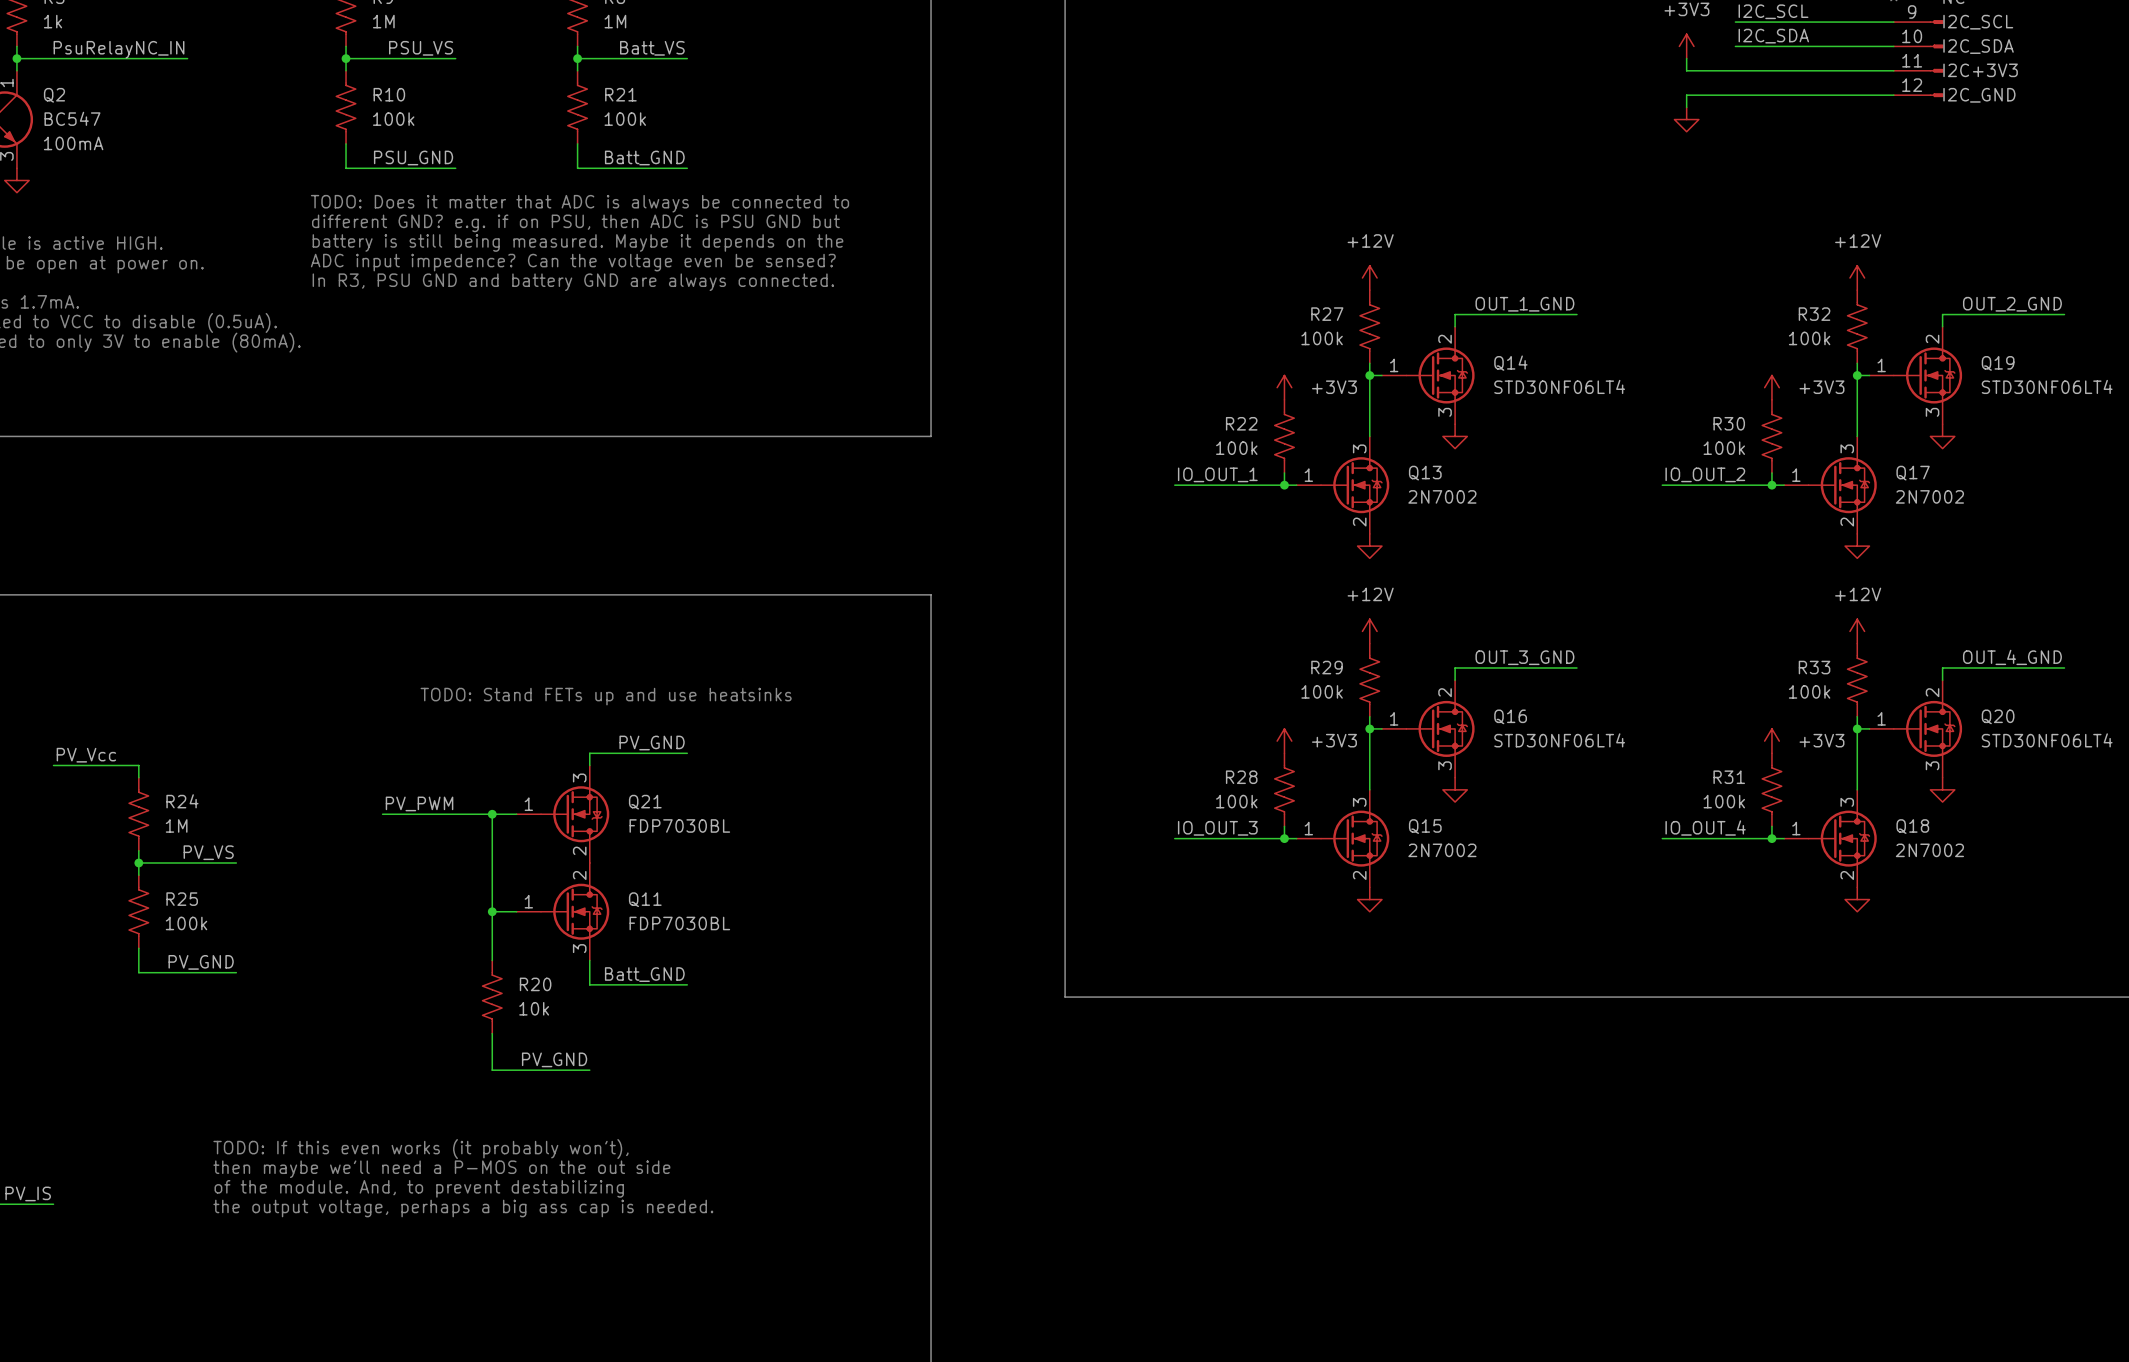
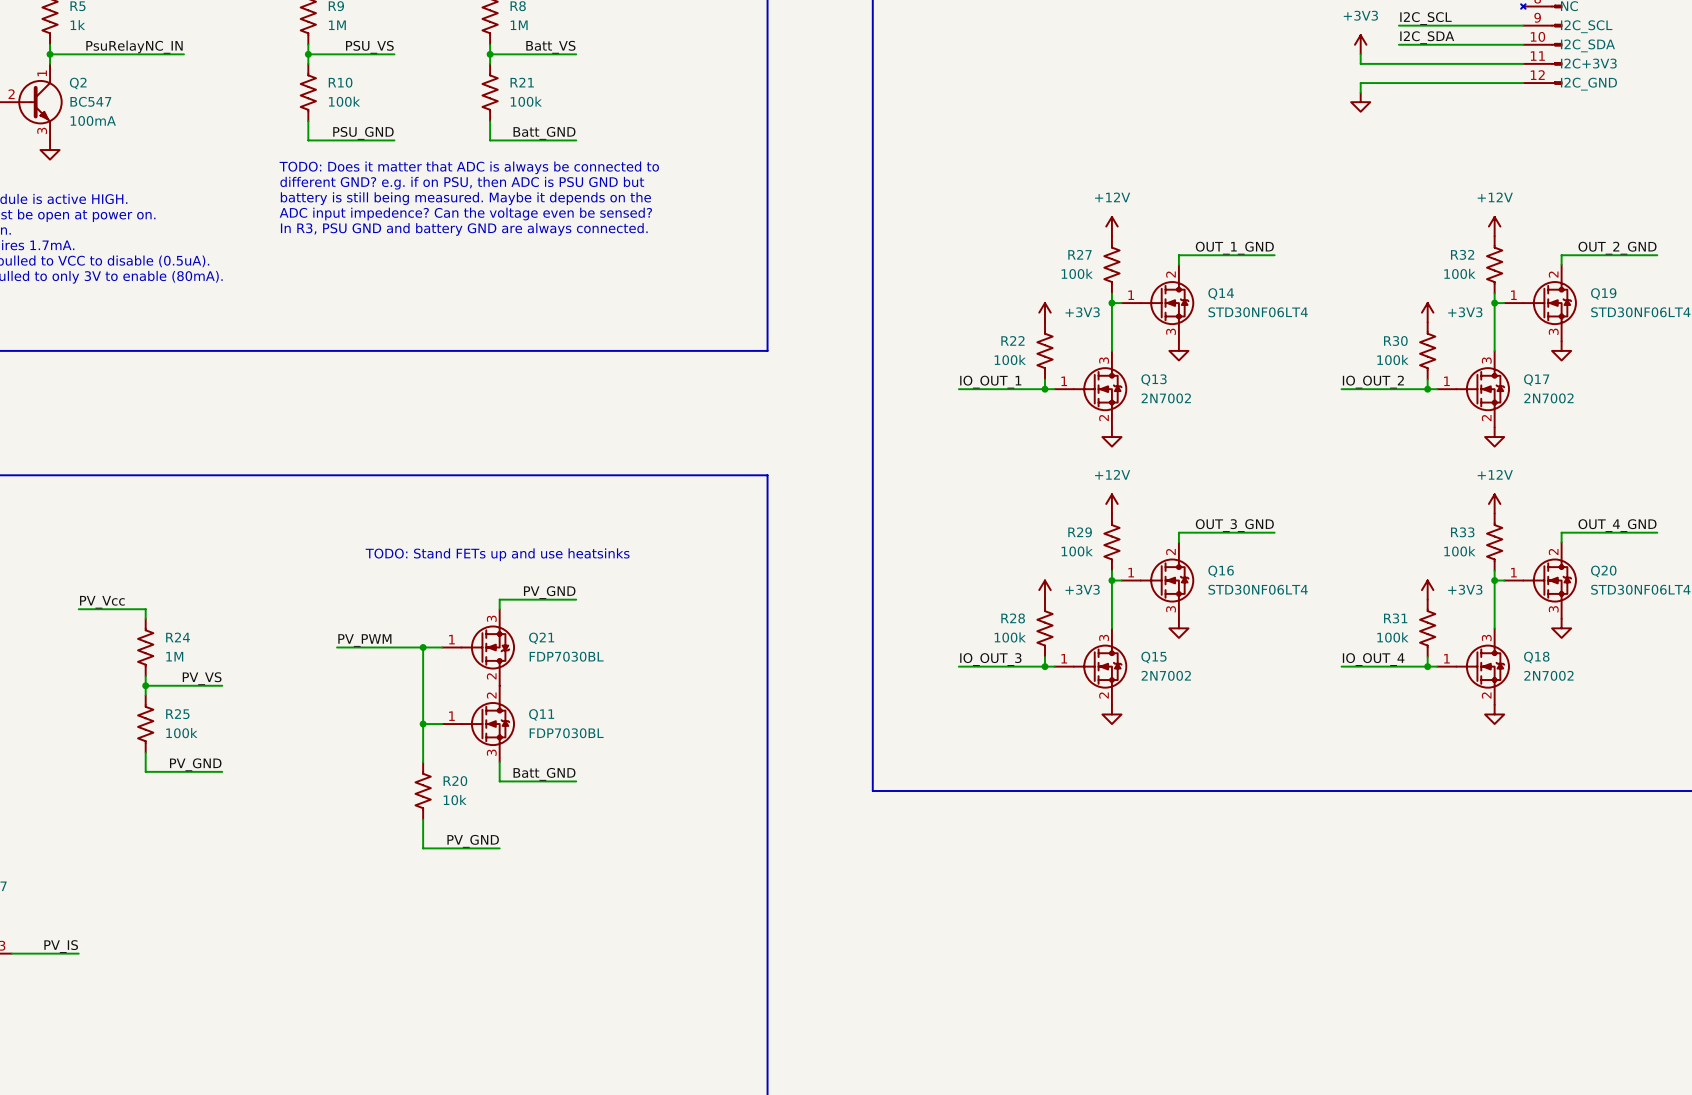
text: TODO: If this even works (it probably won't), (420, 1149) -> none
text: then maybe we'll need a P-MOS on the out side (441, 1169) -> none
text: of the module. And, to prevent destabilizing (419, 1188) -> none
text: the output voltage, perhaps a big ass cap is needed. (463, 1208) -> none

